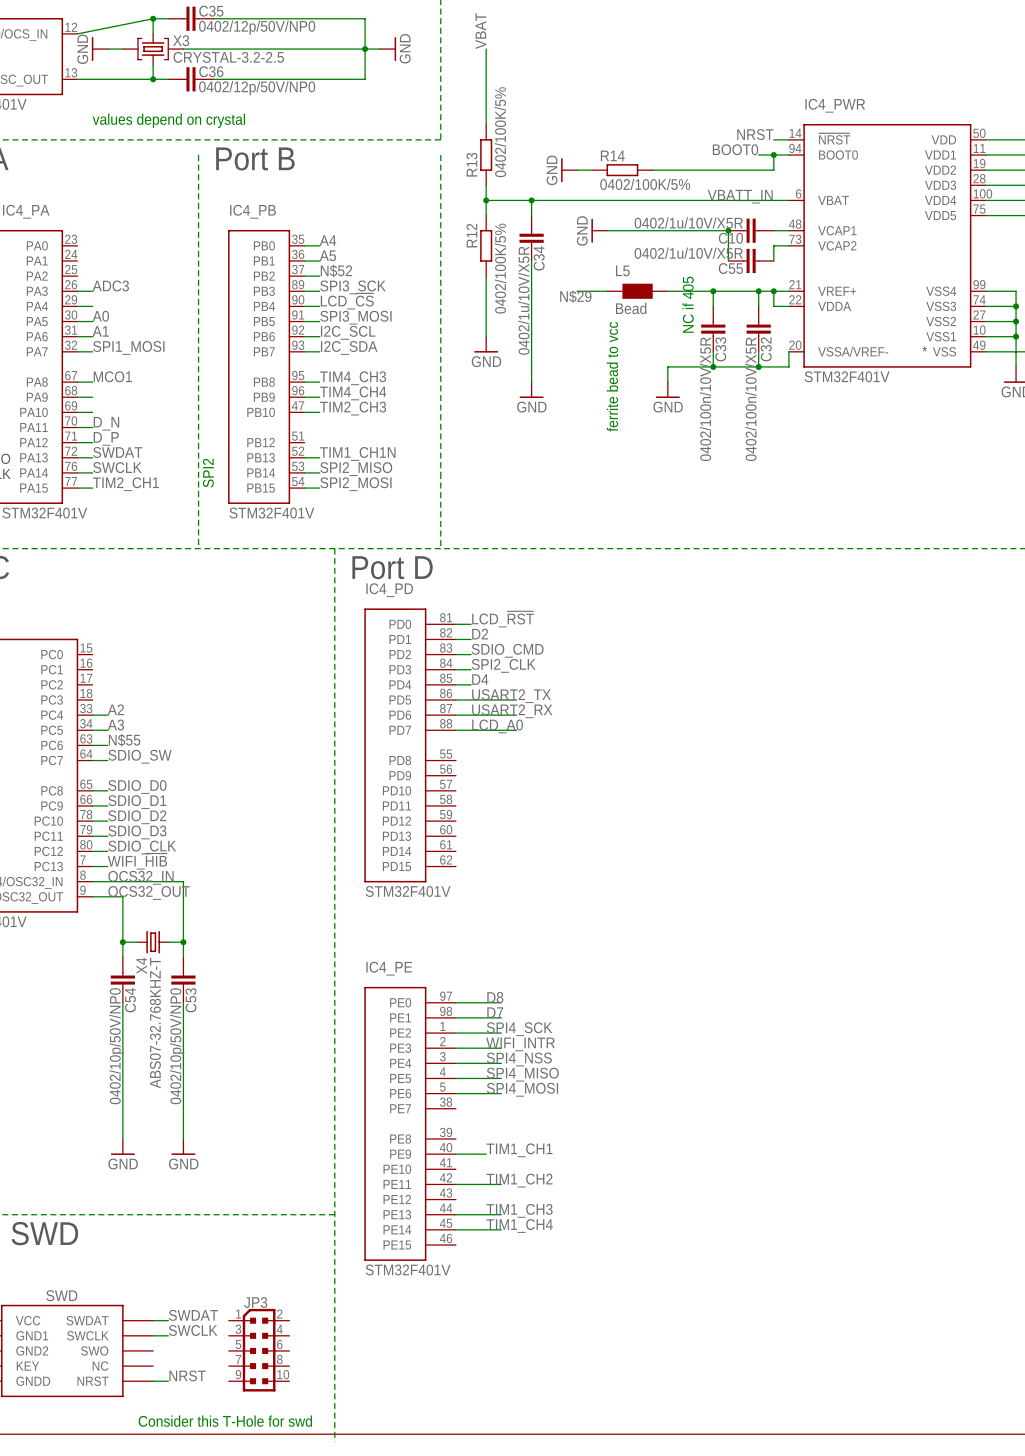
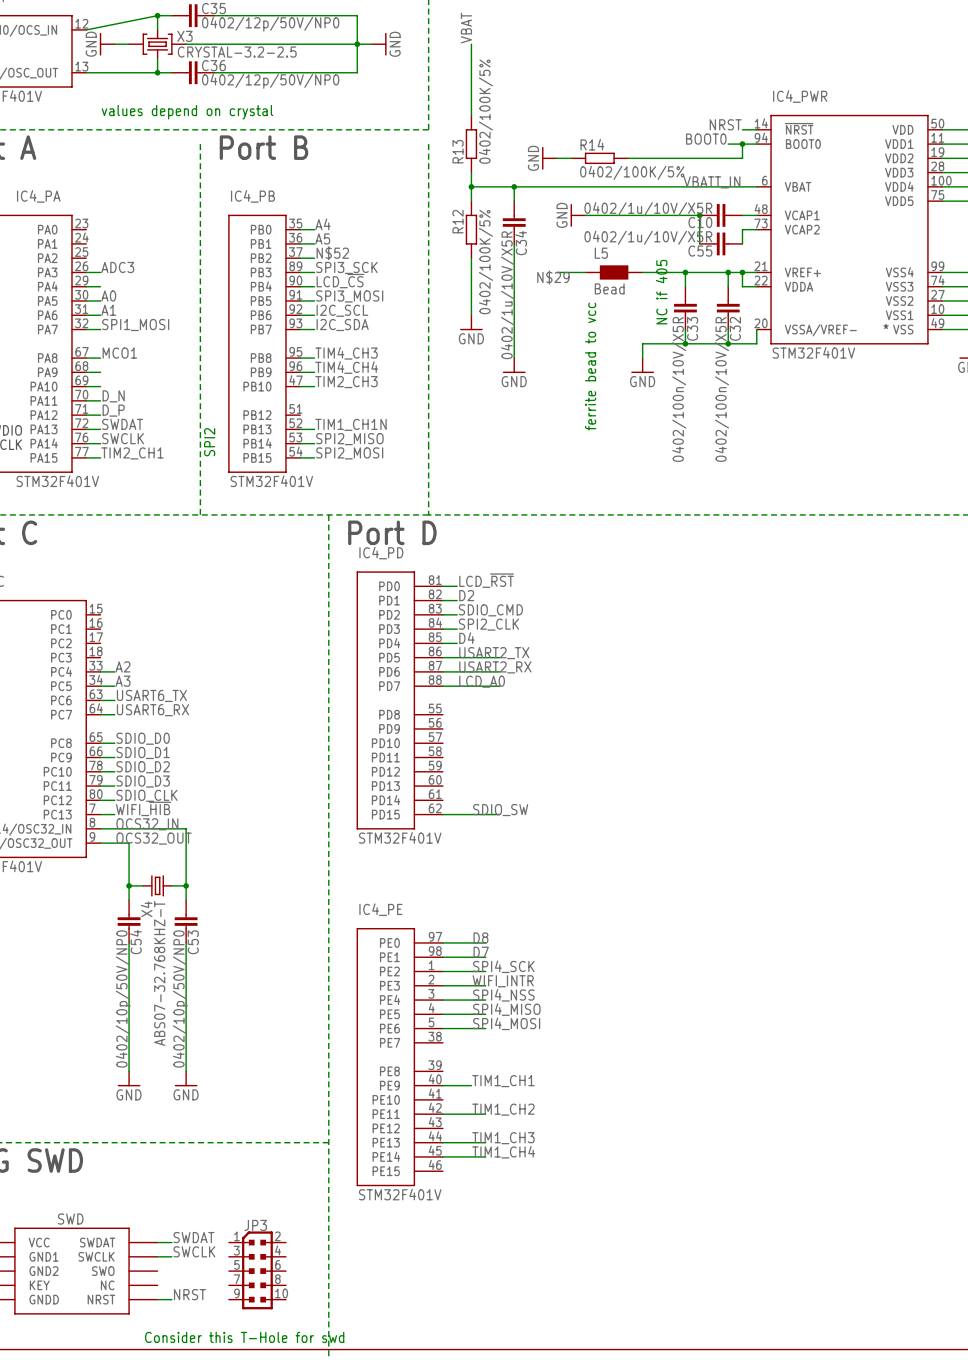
label: N$55 (124, 740) -> USART6_TX (151, 695)
label: SDIO_SW (139, 756) -> USART6_RX (152, 710)
label: none -> SDIO_SW (500, 810)
wire: none -> (442, 814) (499, 814)

